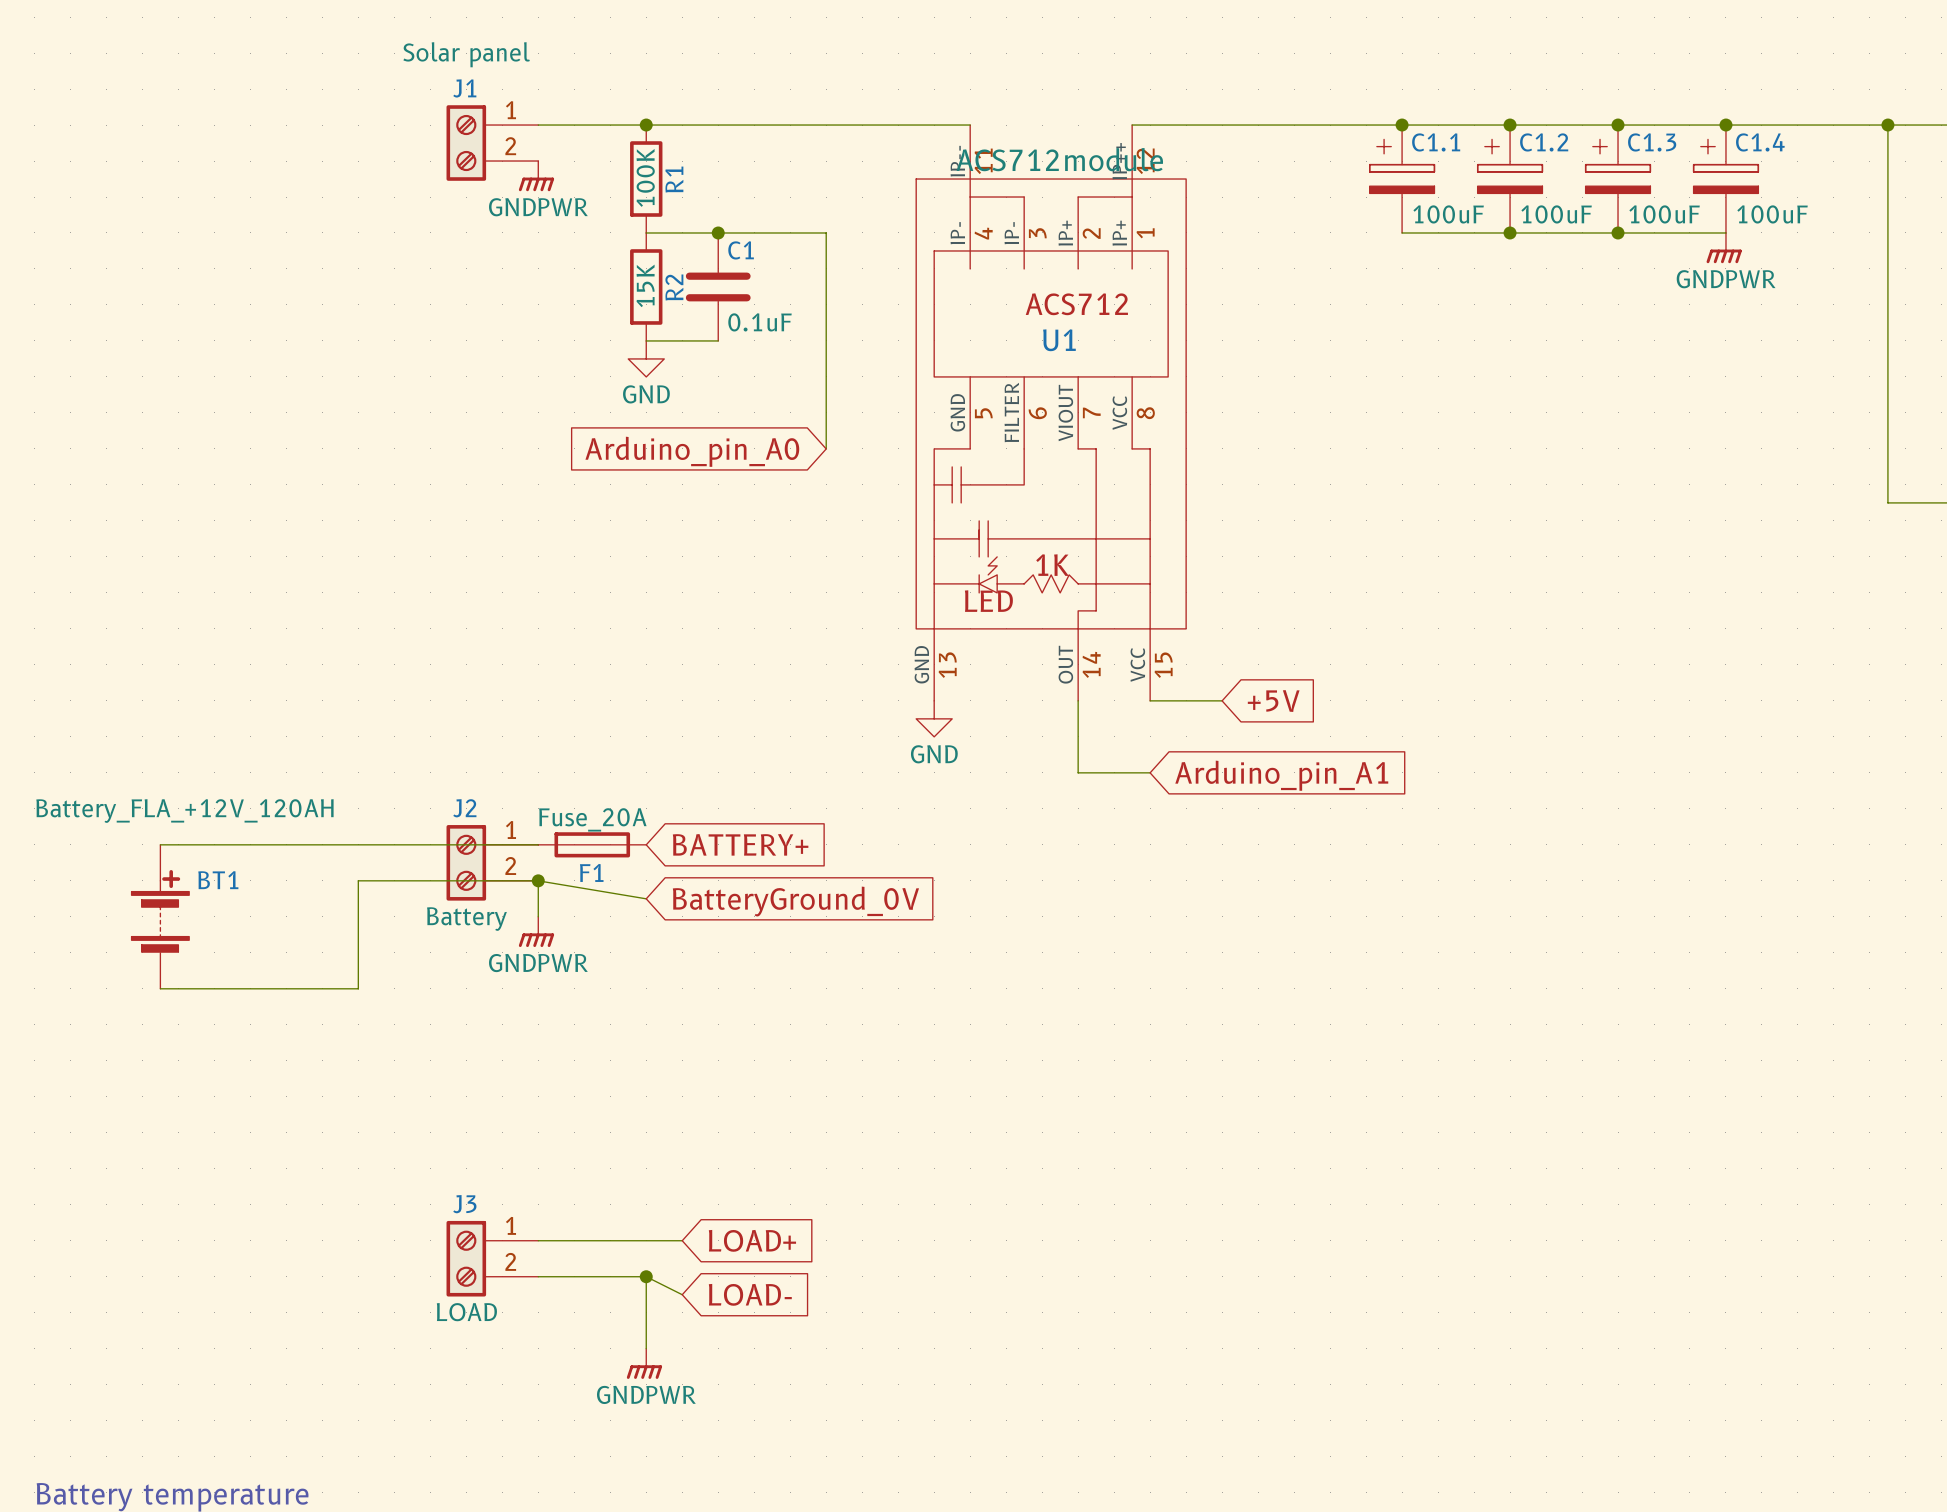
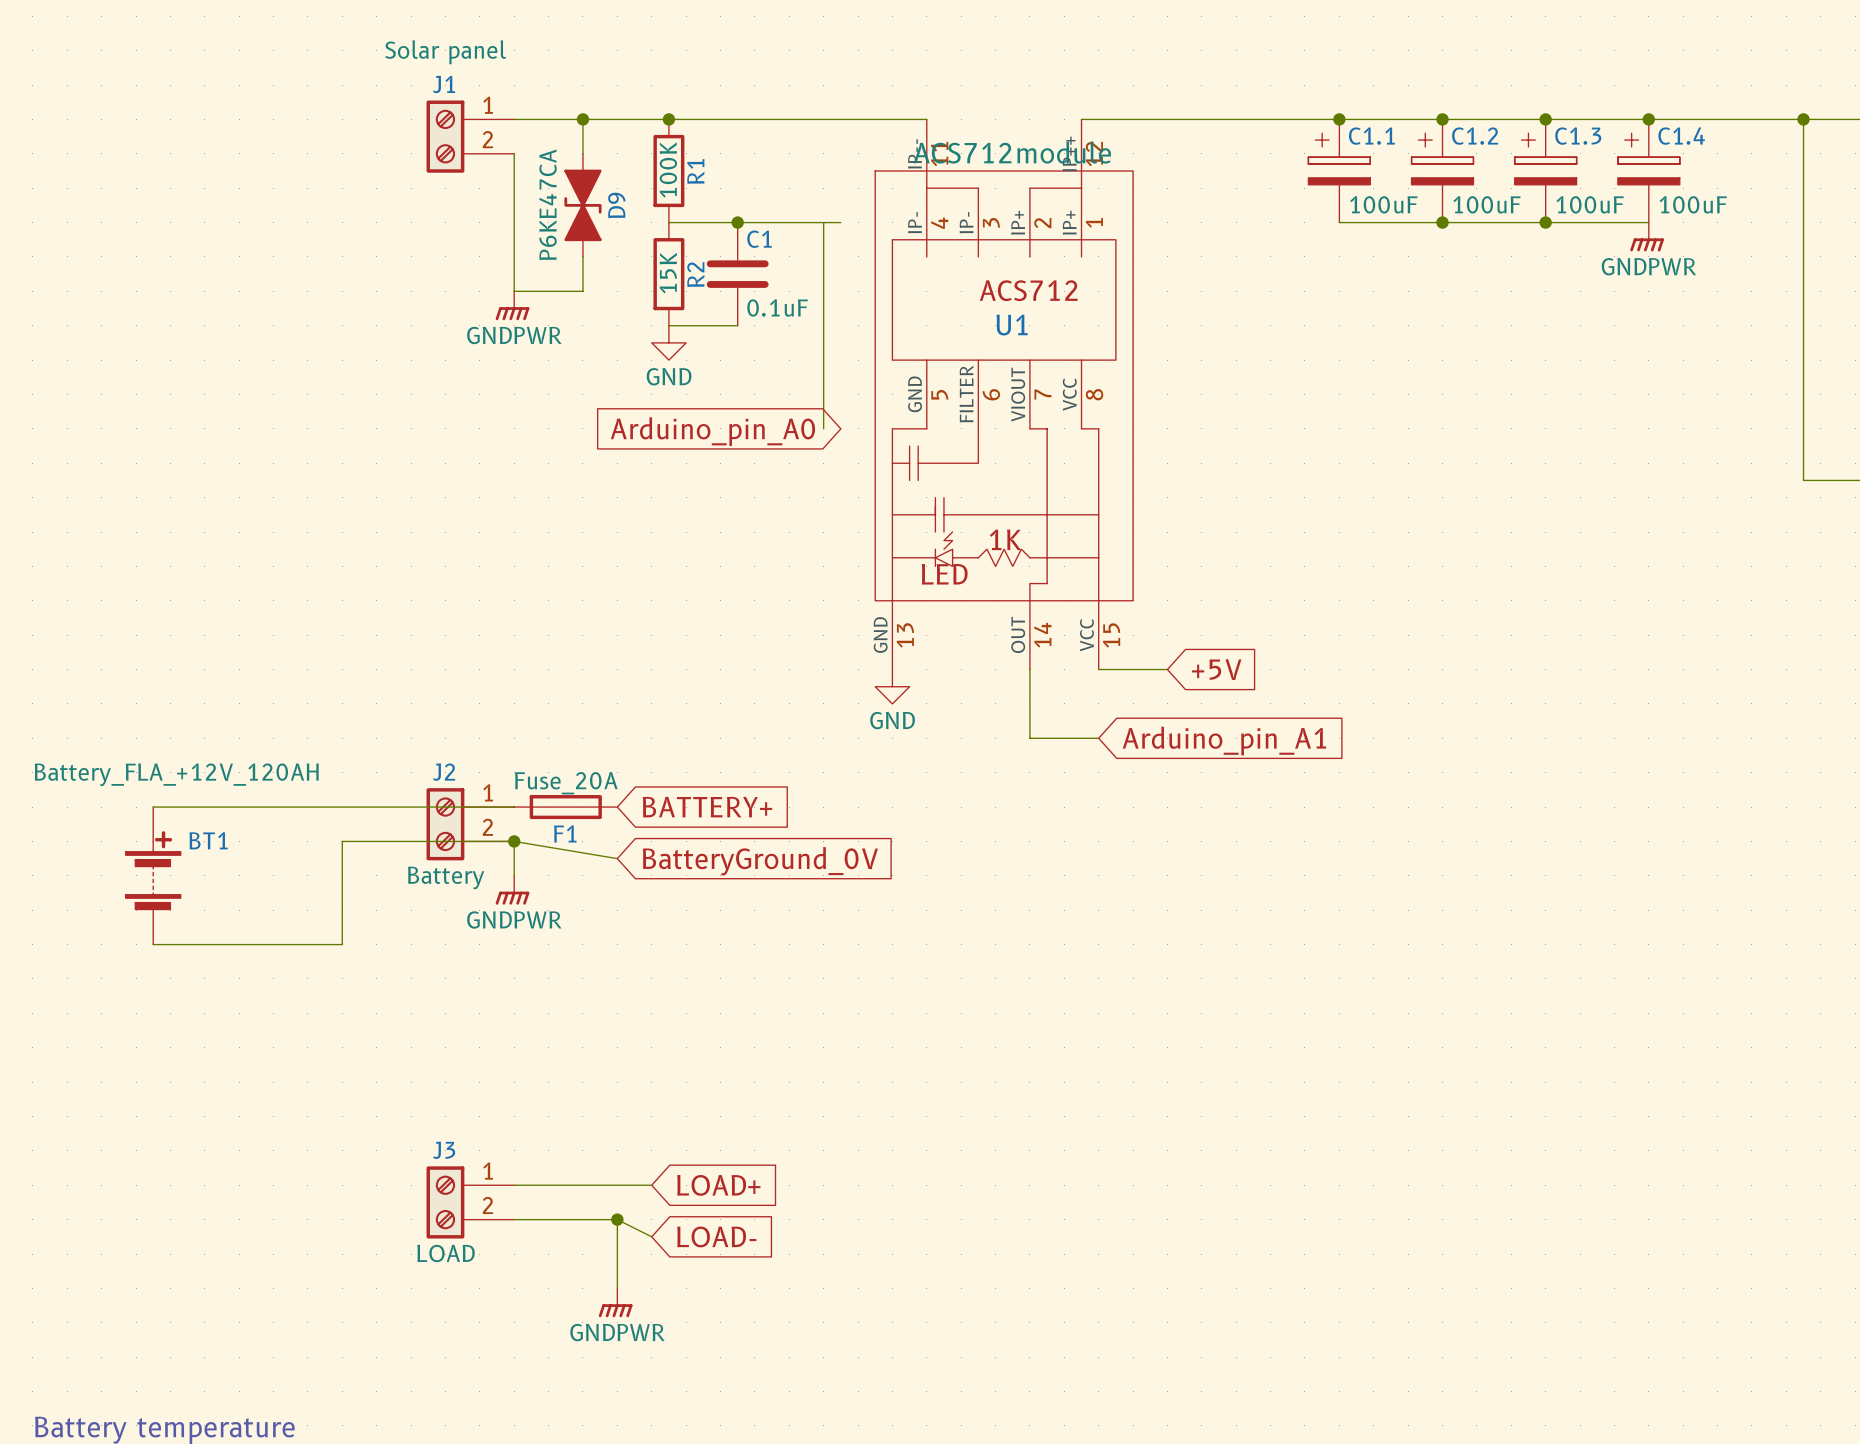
wire: none -> (582, 119) (582, 153)
junction: none -> (582, 119)
junction: (646, 125) -> none
junction: none -> (668, 119)
wire: none -> (514, 153) (514, 291) (582, 291) (582, 256)
power symbol position: GNDPWR (536, 176) -> GNDPWR (512, 305)
R1 position: (646, 179) -> (668, 171)
D9: none -> P6KE47CA (582, 205)
wire: (646, 232) (700, 232) -> none
junction position: (718, 232) -> (737, 222)
wire: (826, 232) (826, 448) -> (789, 222) (840, 222)
wire: none -> (823, 222) (823, 428)
R2 position: (646, 286) -> (668, 274)
C1 position: (718, 286) -> (737, 274)
wire: (646, 340) (700, 340) -> (686, 325) (737, 325)
power symbol position: GND (646, 358) -> GND (668, 342)
global label position: Arduino_pin_A0 (692, 451) -> Arduino_pin_A0 (712, 431)

